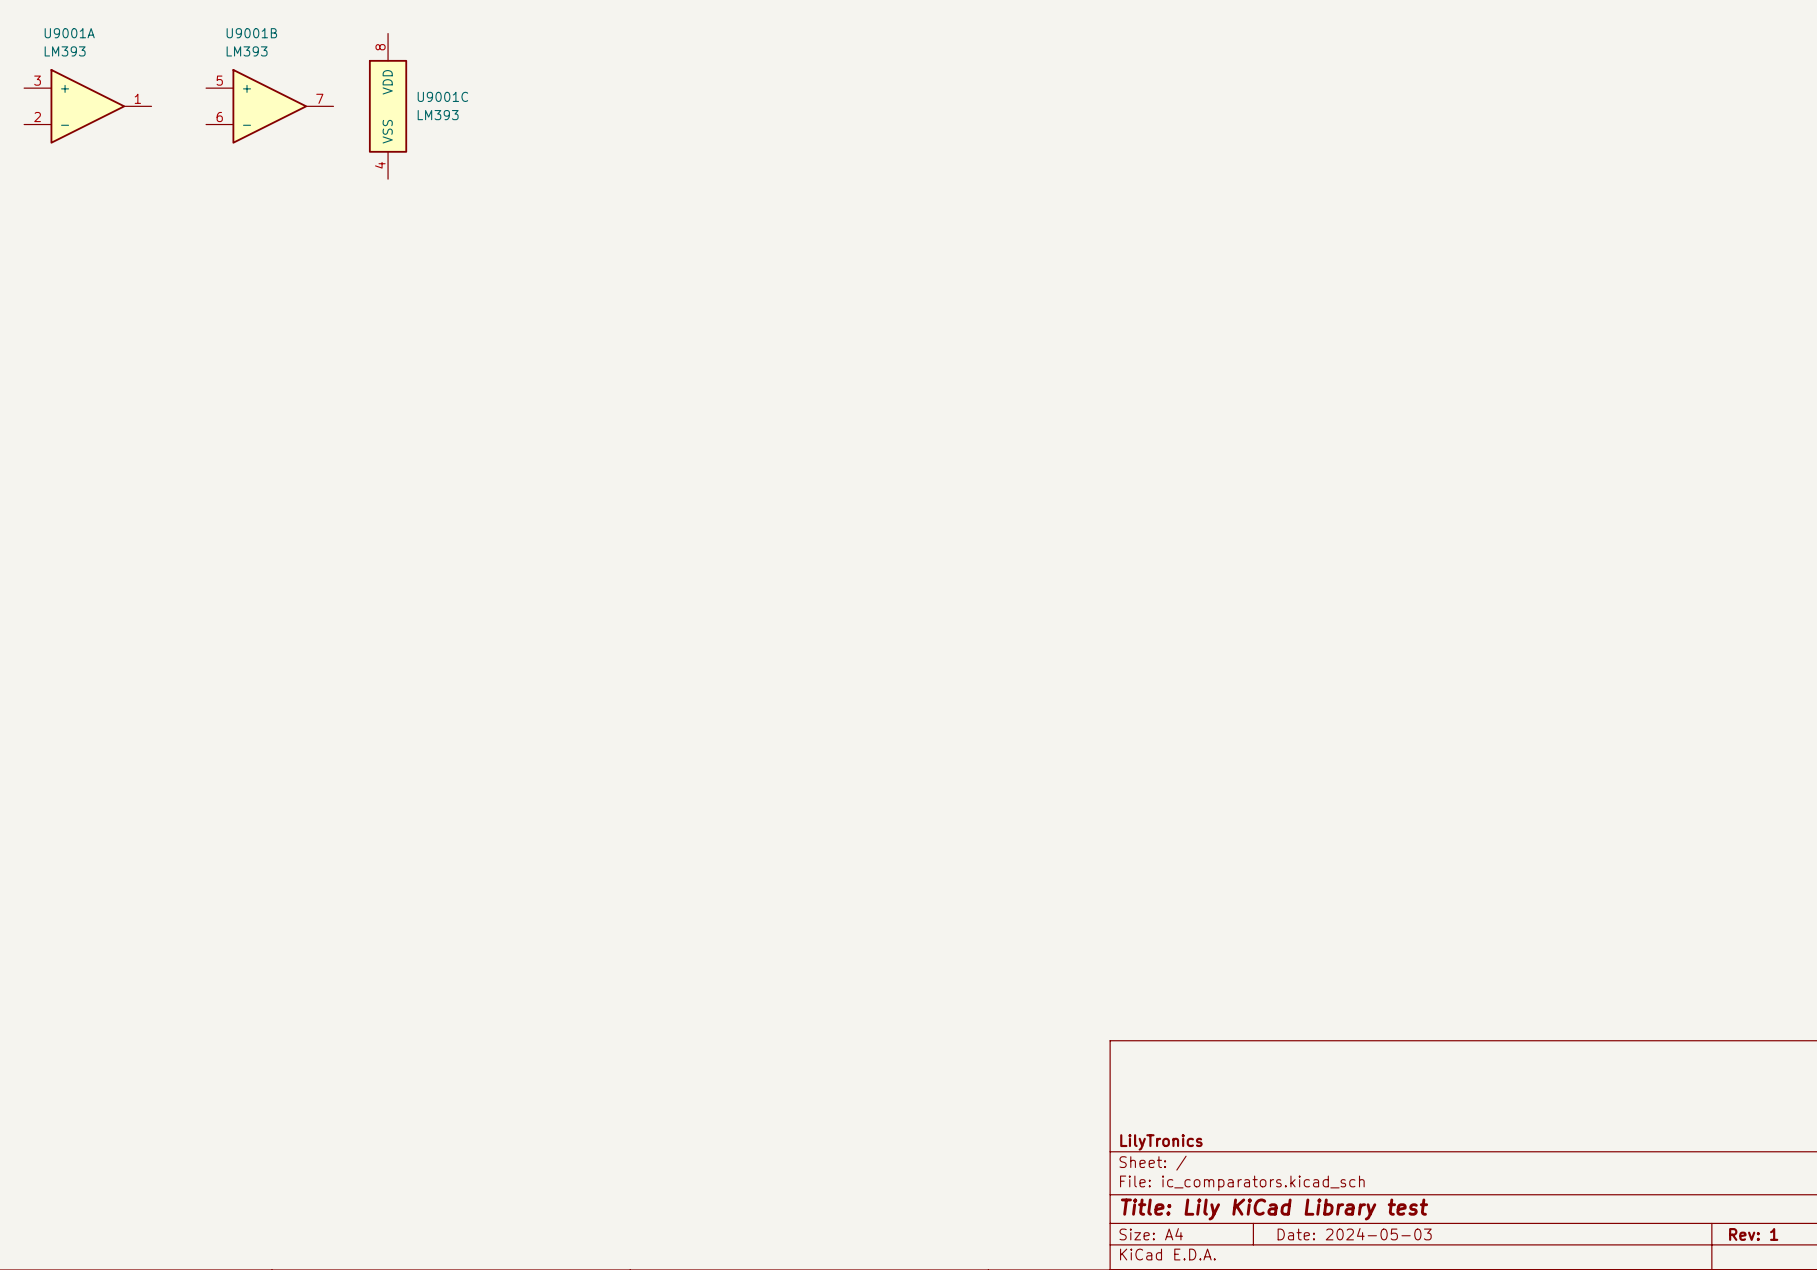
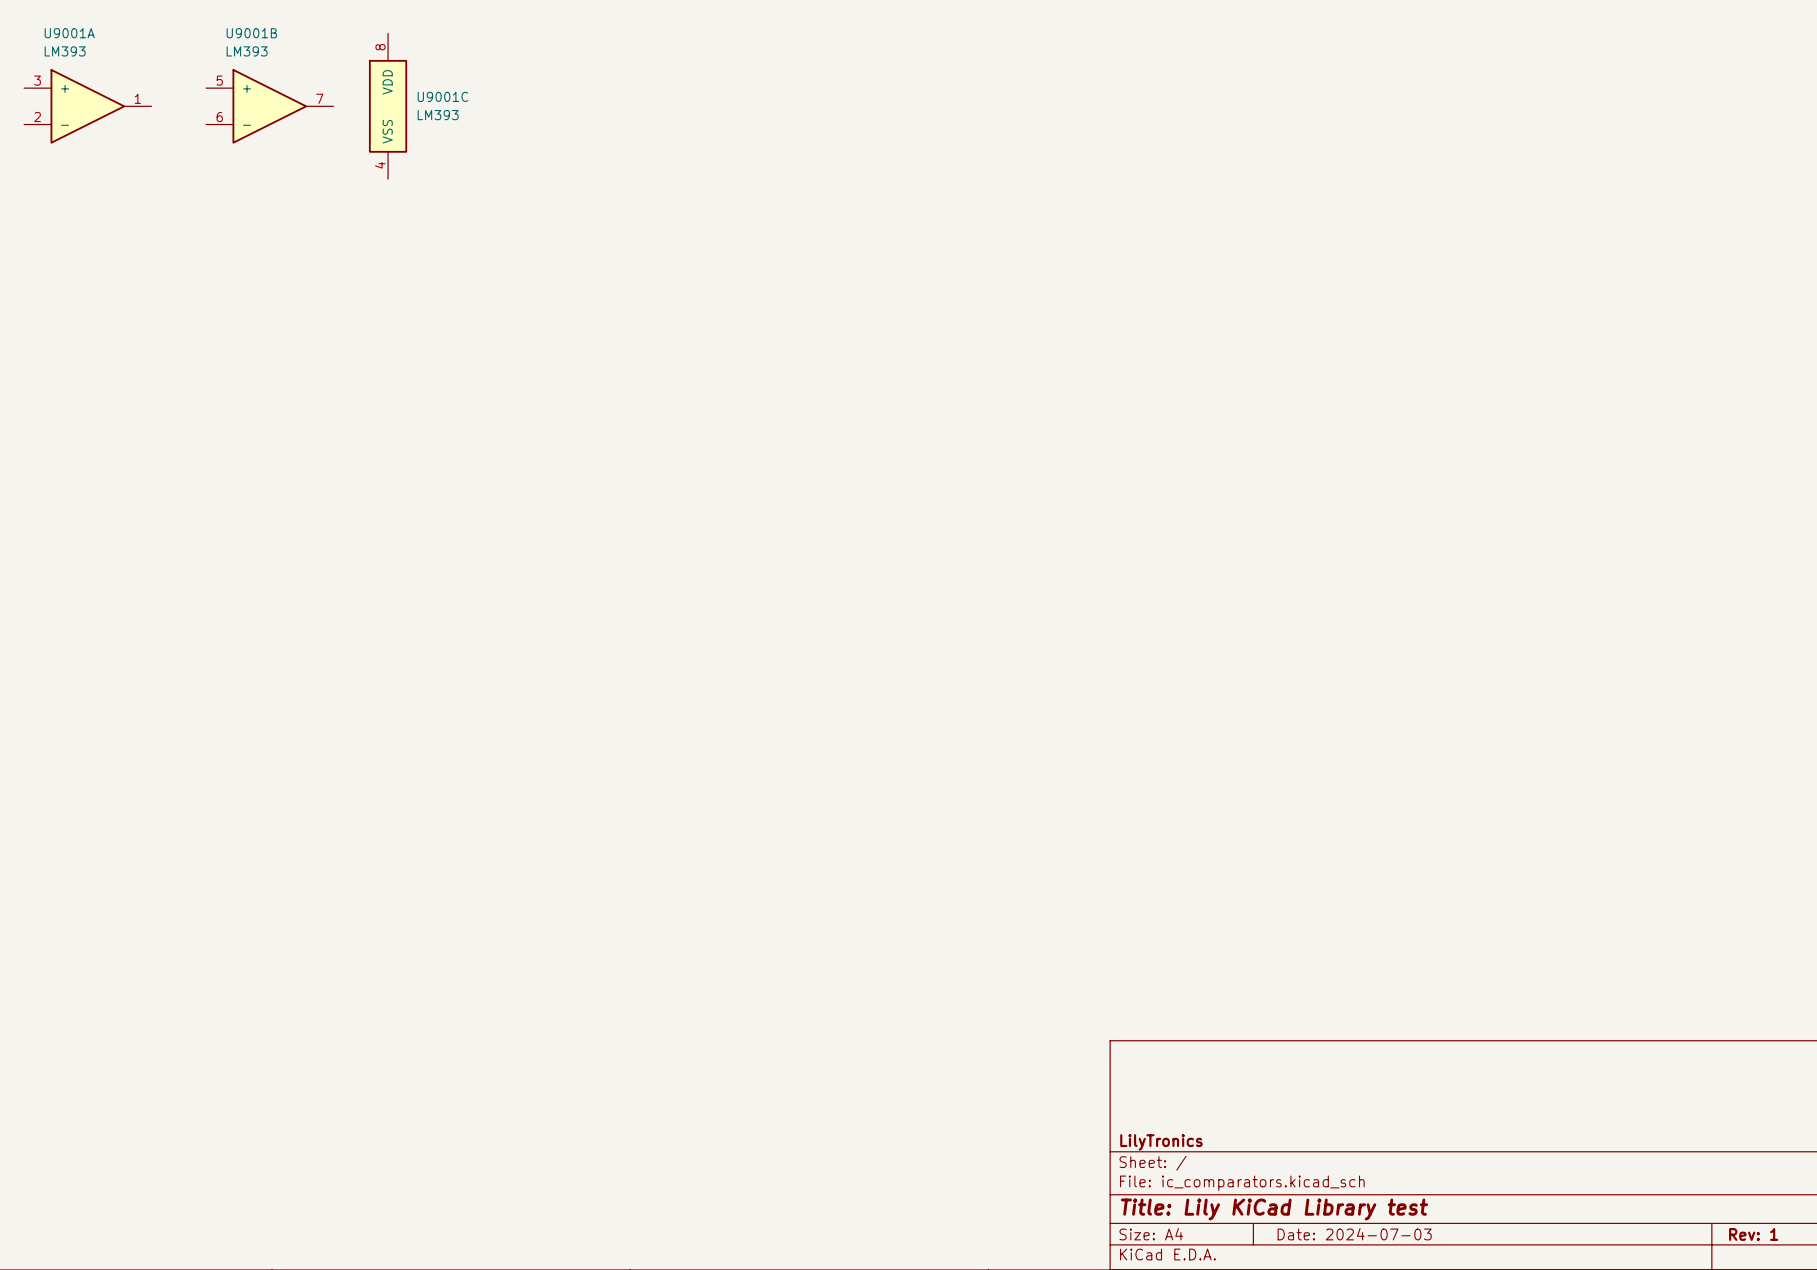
title block: Date: 2024-05-03 (1354, 1234) -> Date: 2024-07-03 (1354, 1234)

